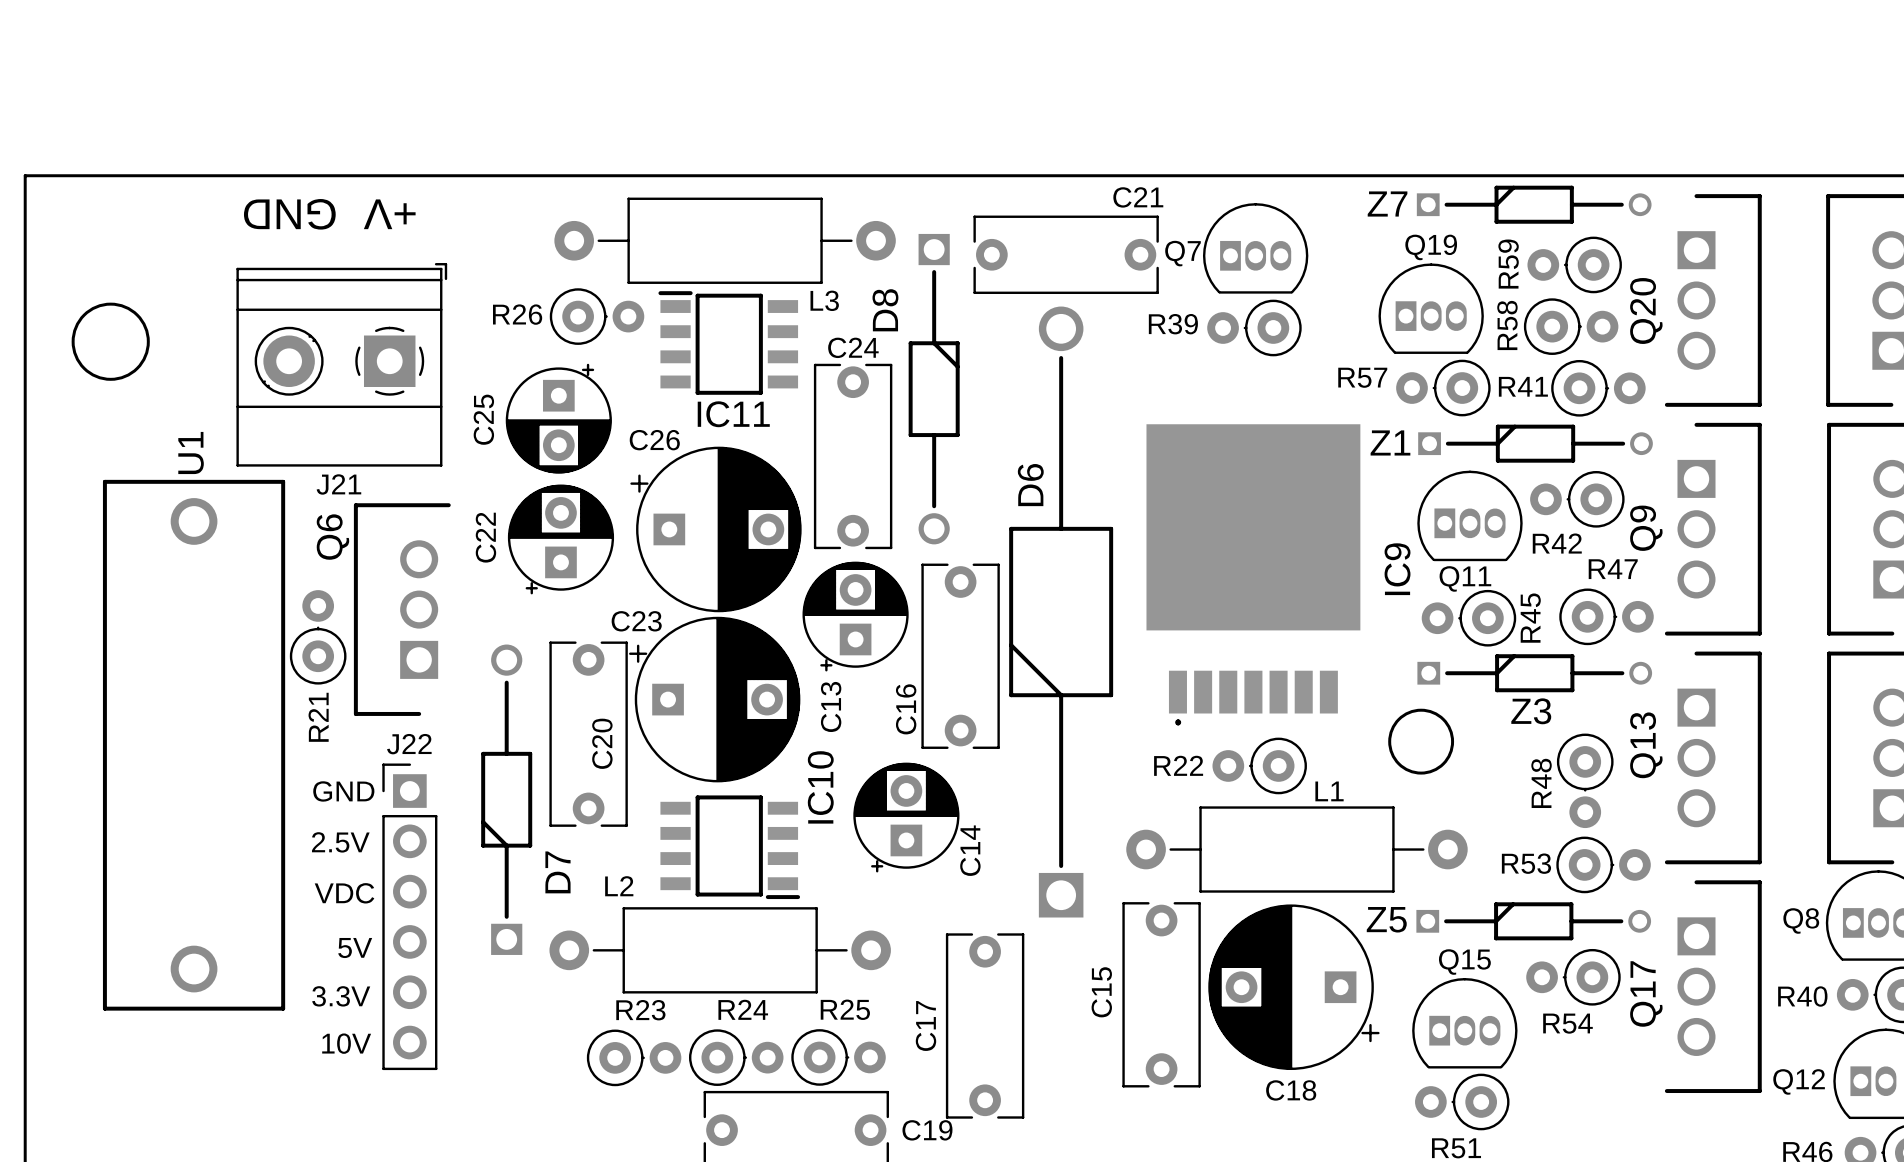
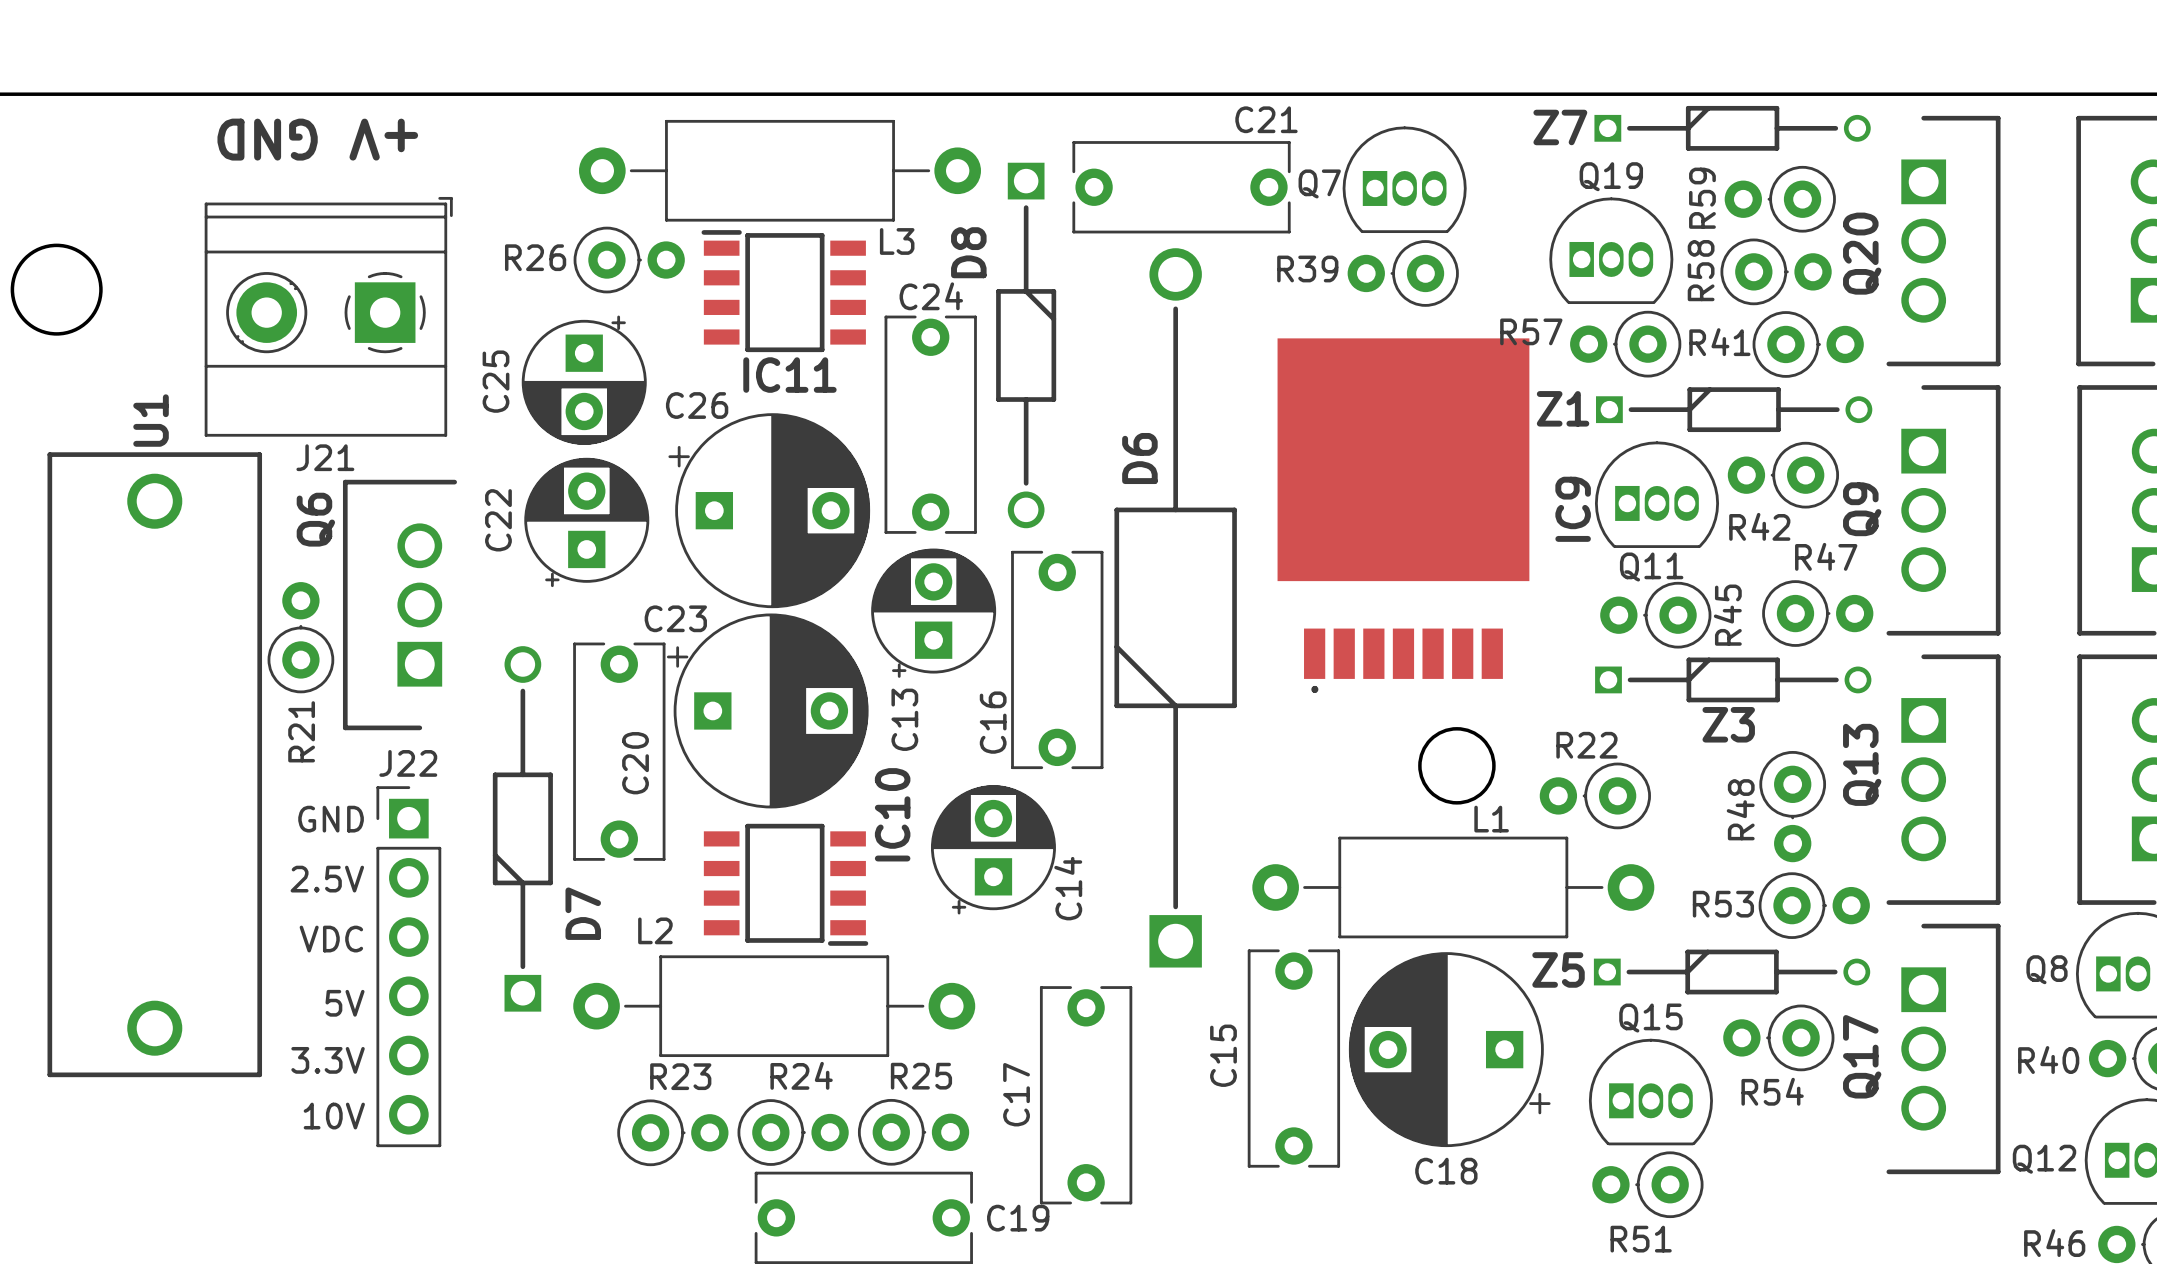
IC9 position: (1253, 574) -> (1403, 515)
round board edge position: (1421, 741) -> (1456, 765)
R22 name position: R22 (1178, 765) -> R22 (1586, 745)
R22 position: (1259, 765) -> (1595, 795)

